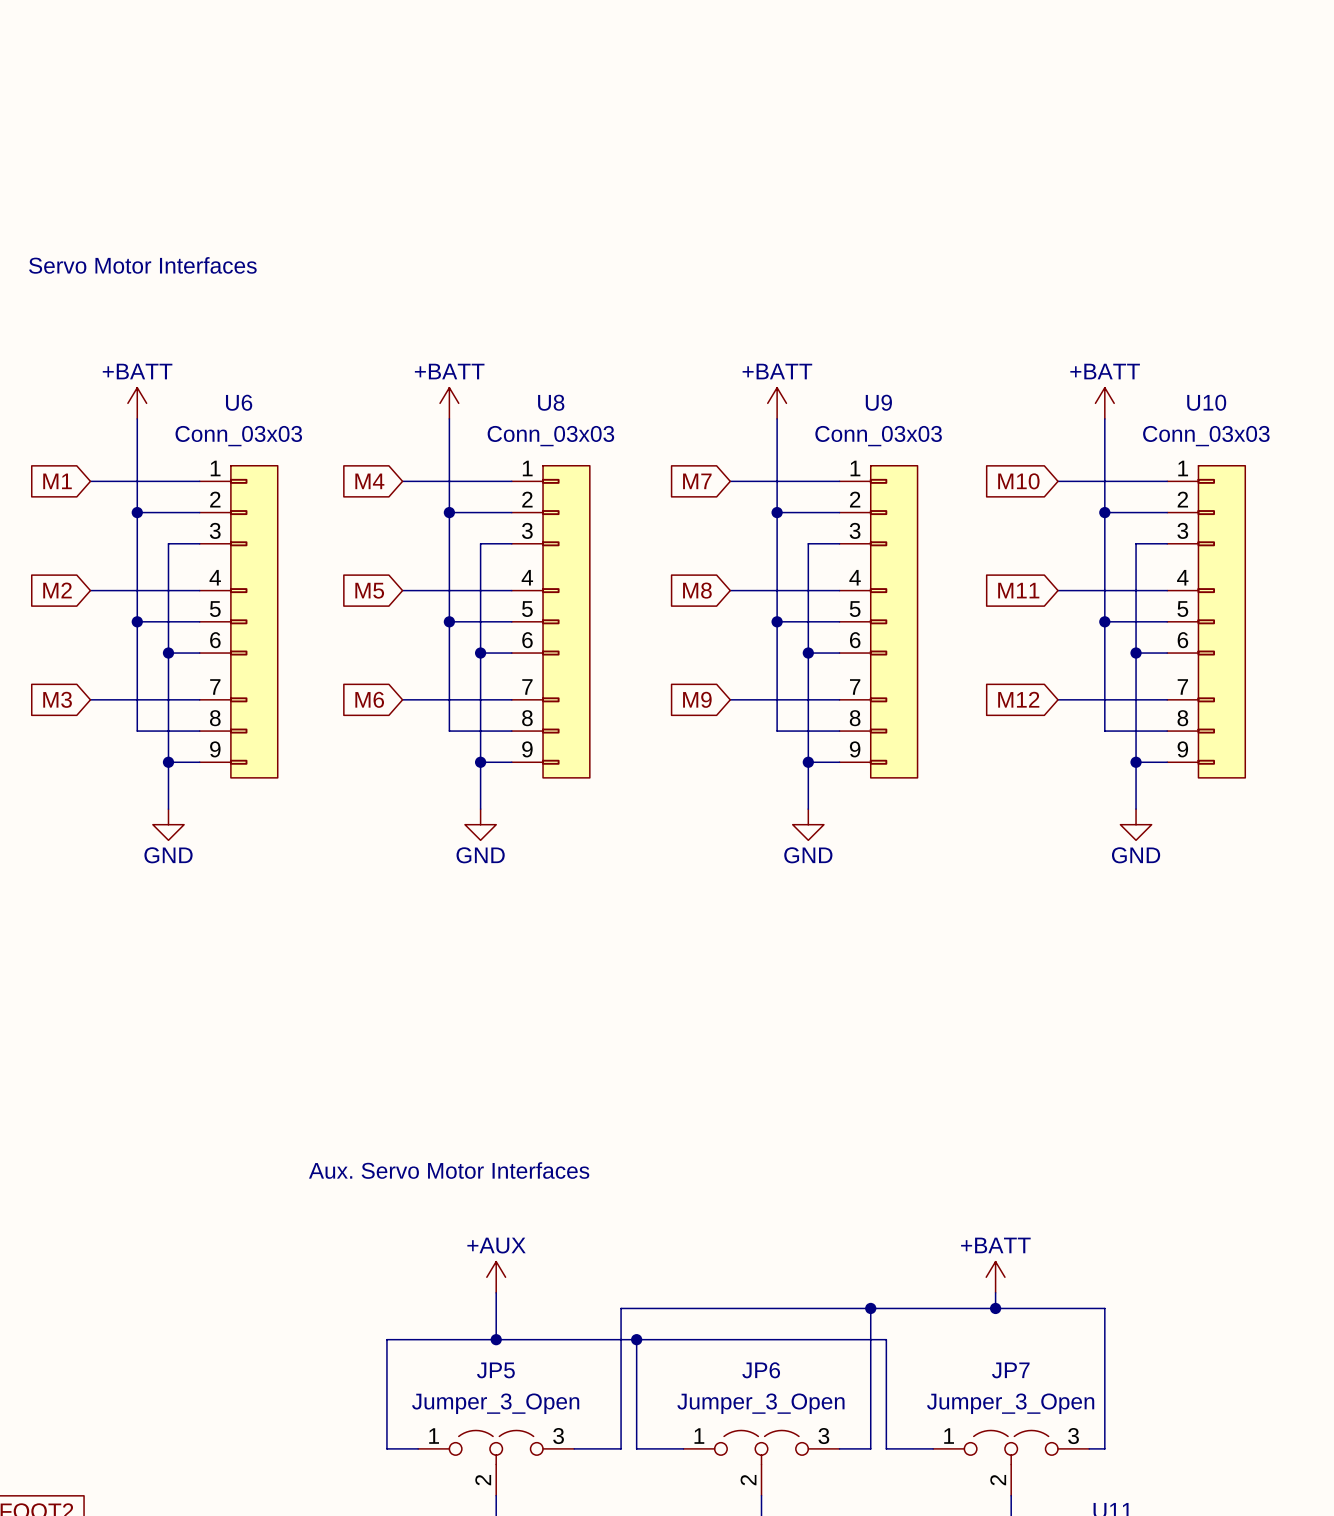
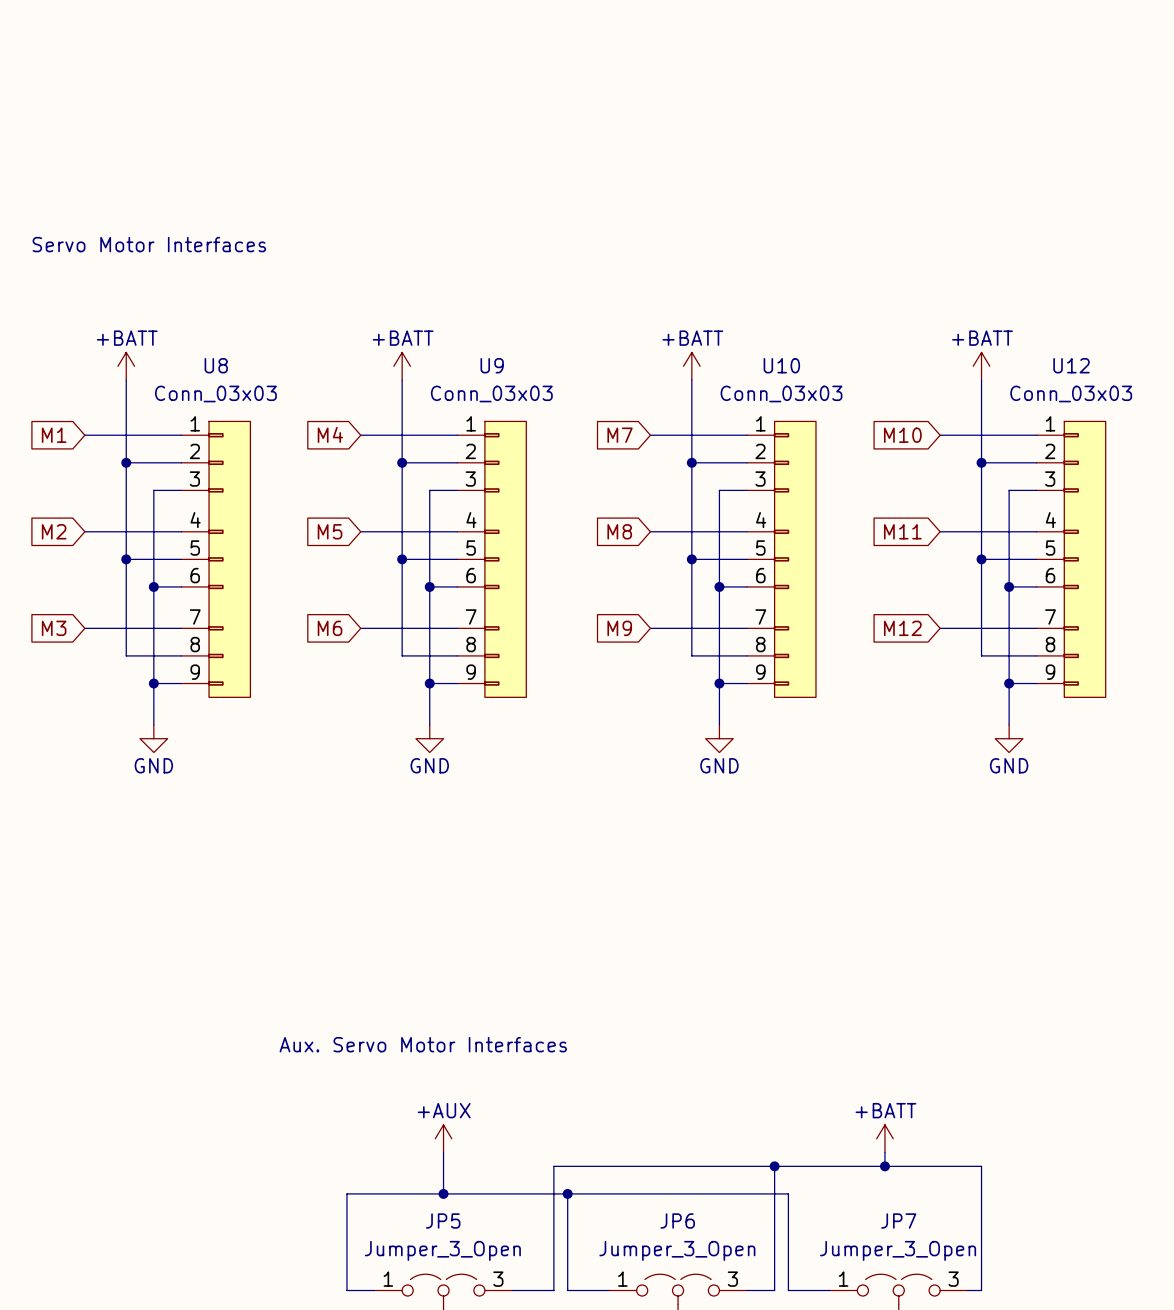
U6 name: U6 (239, 402) -> U8 (216, 365)
U8 name: U8 (551, 402) -> U9 (492, 365)
U9 name: U9 (878, 402) -> U10 (781, 365)
U10 name: U10 (1206, 402) -> U12 (1071, 365)

